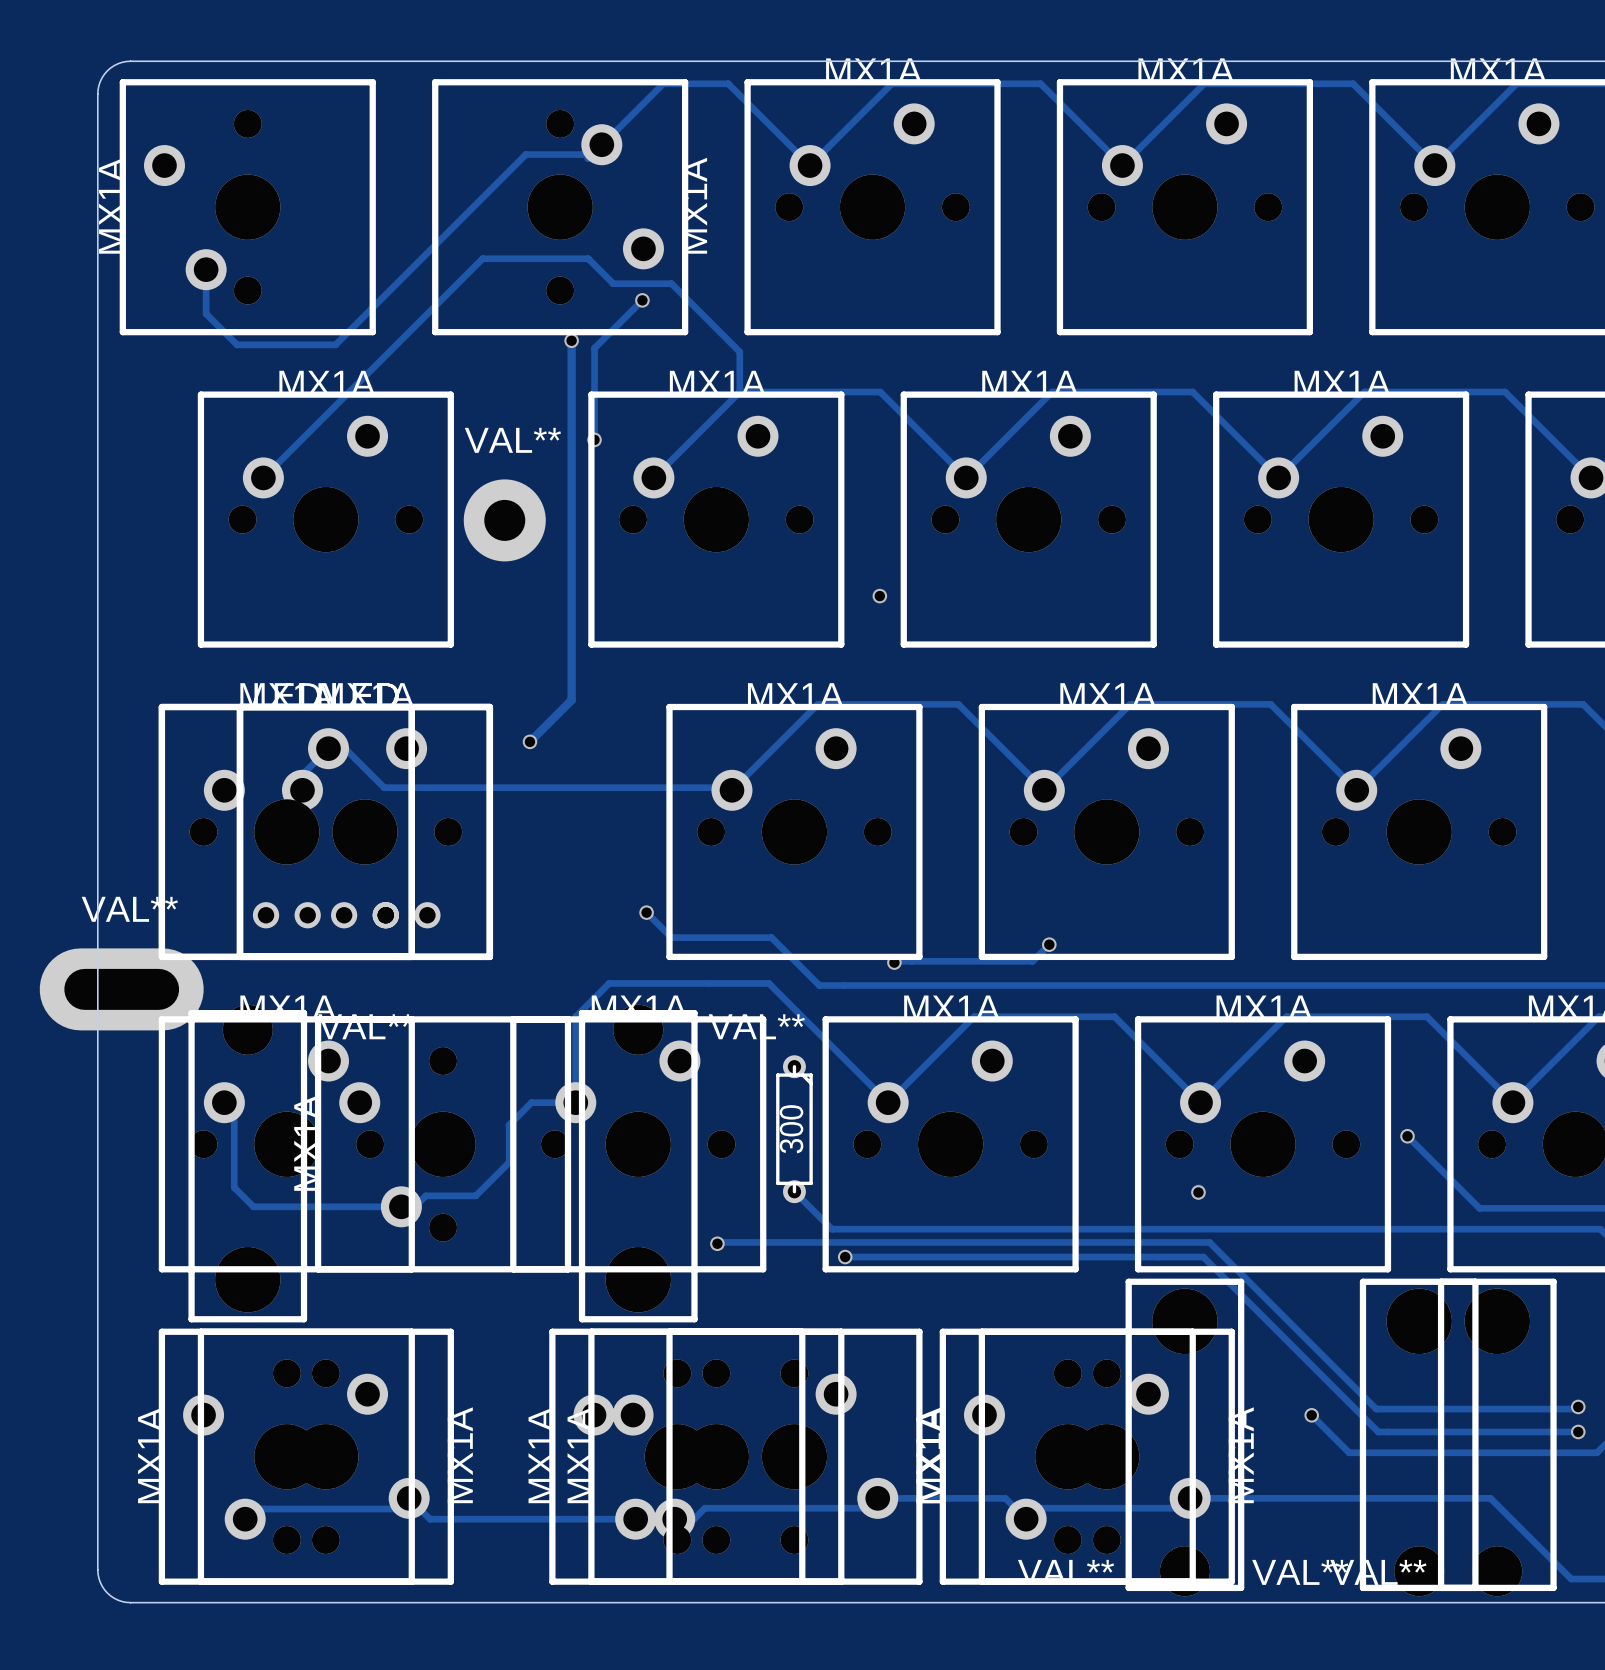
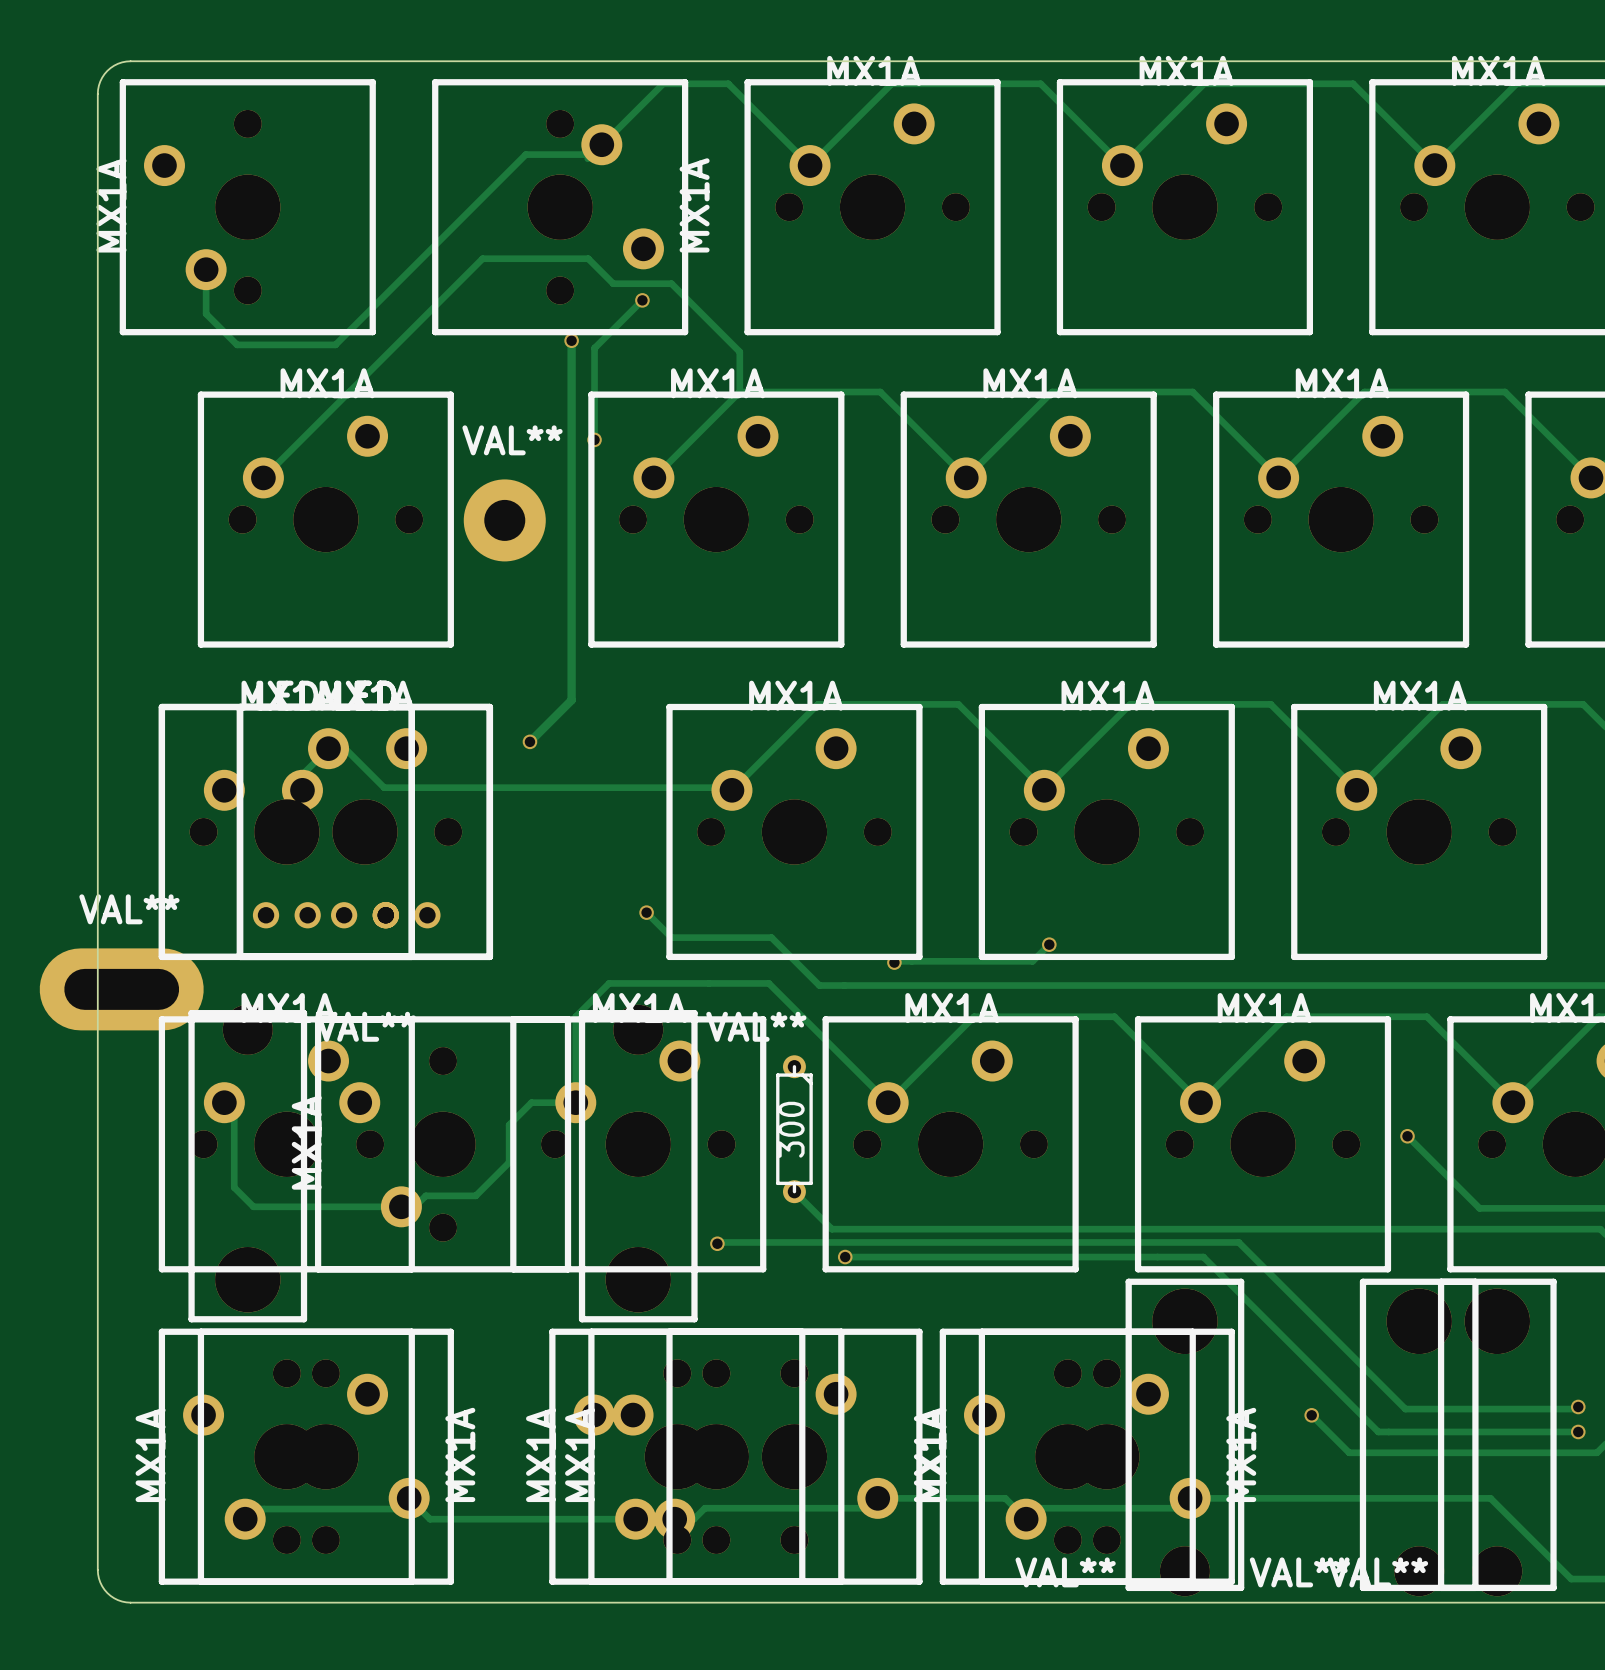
via: (879, 596) -> none
via: (1198, 1192) -> none
track: (1209, 1242) (1376, 1409) (1405, 1409) -> (1209, 1242) (1238, 1242) (1405, 1409)

